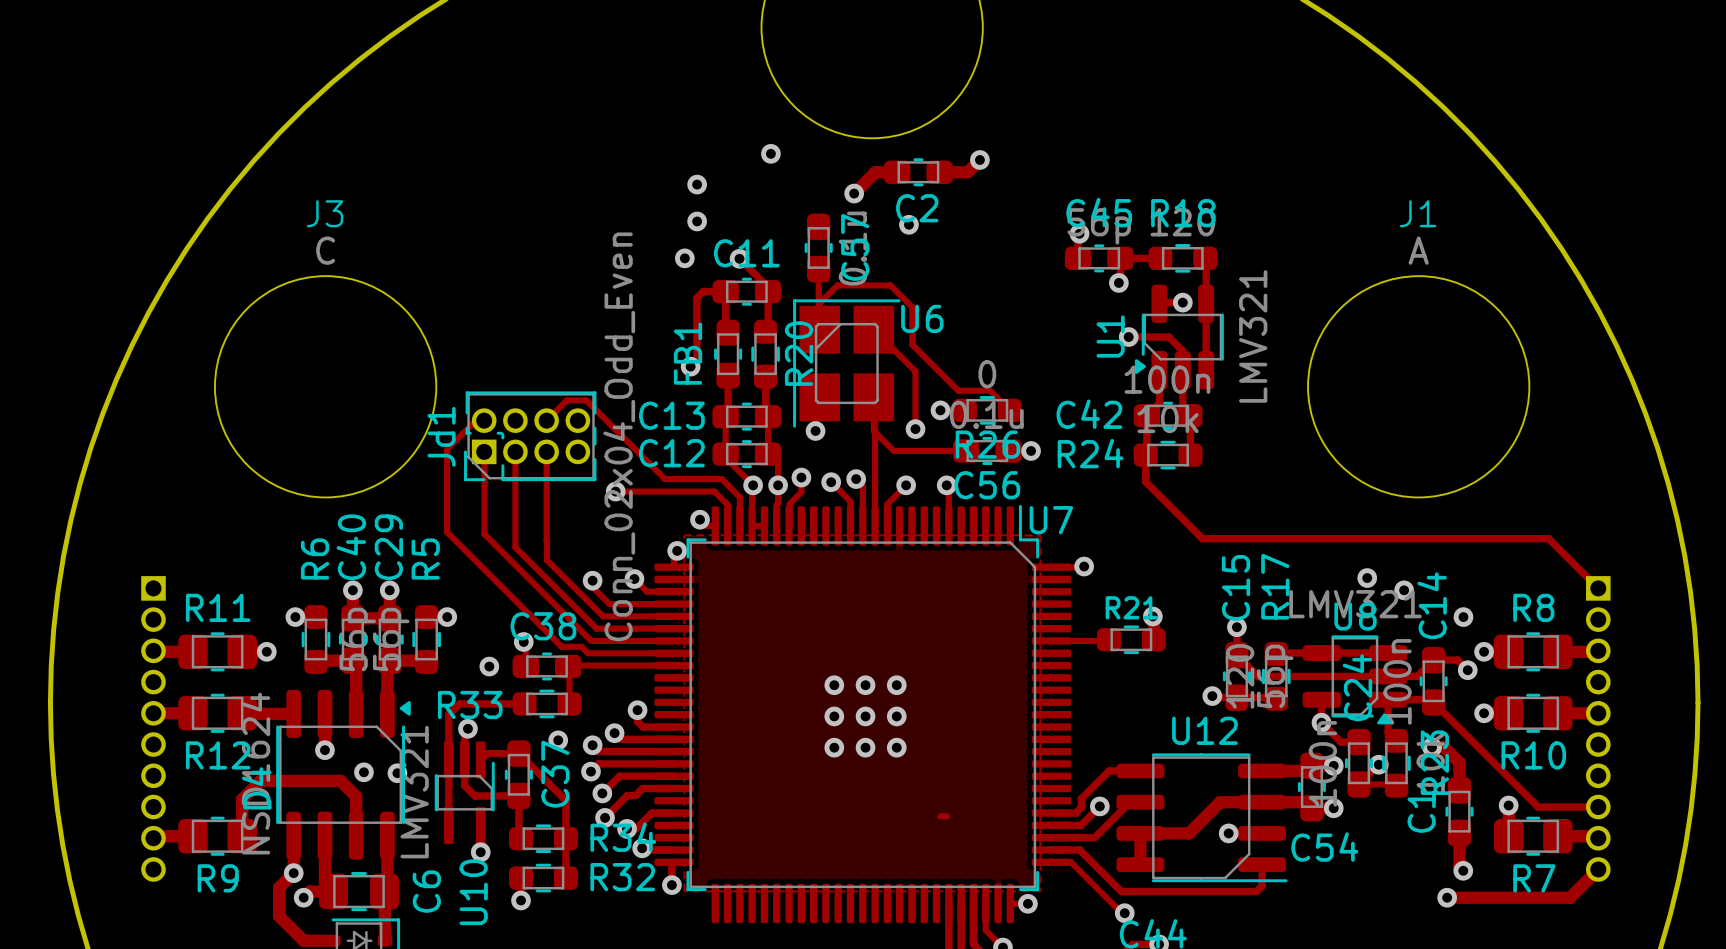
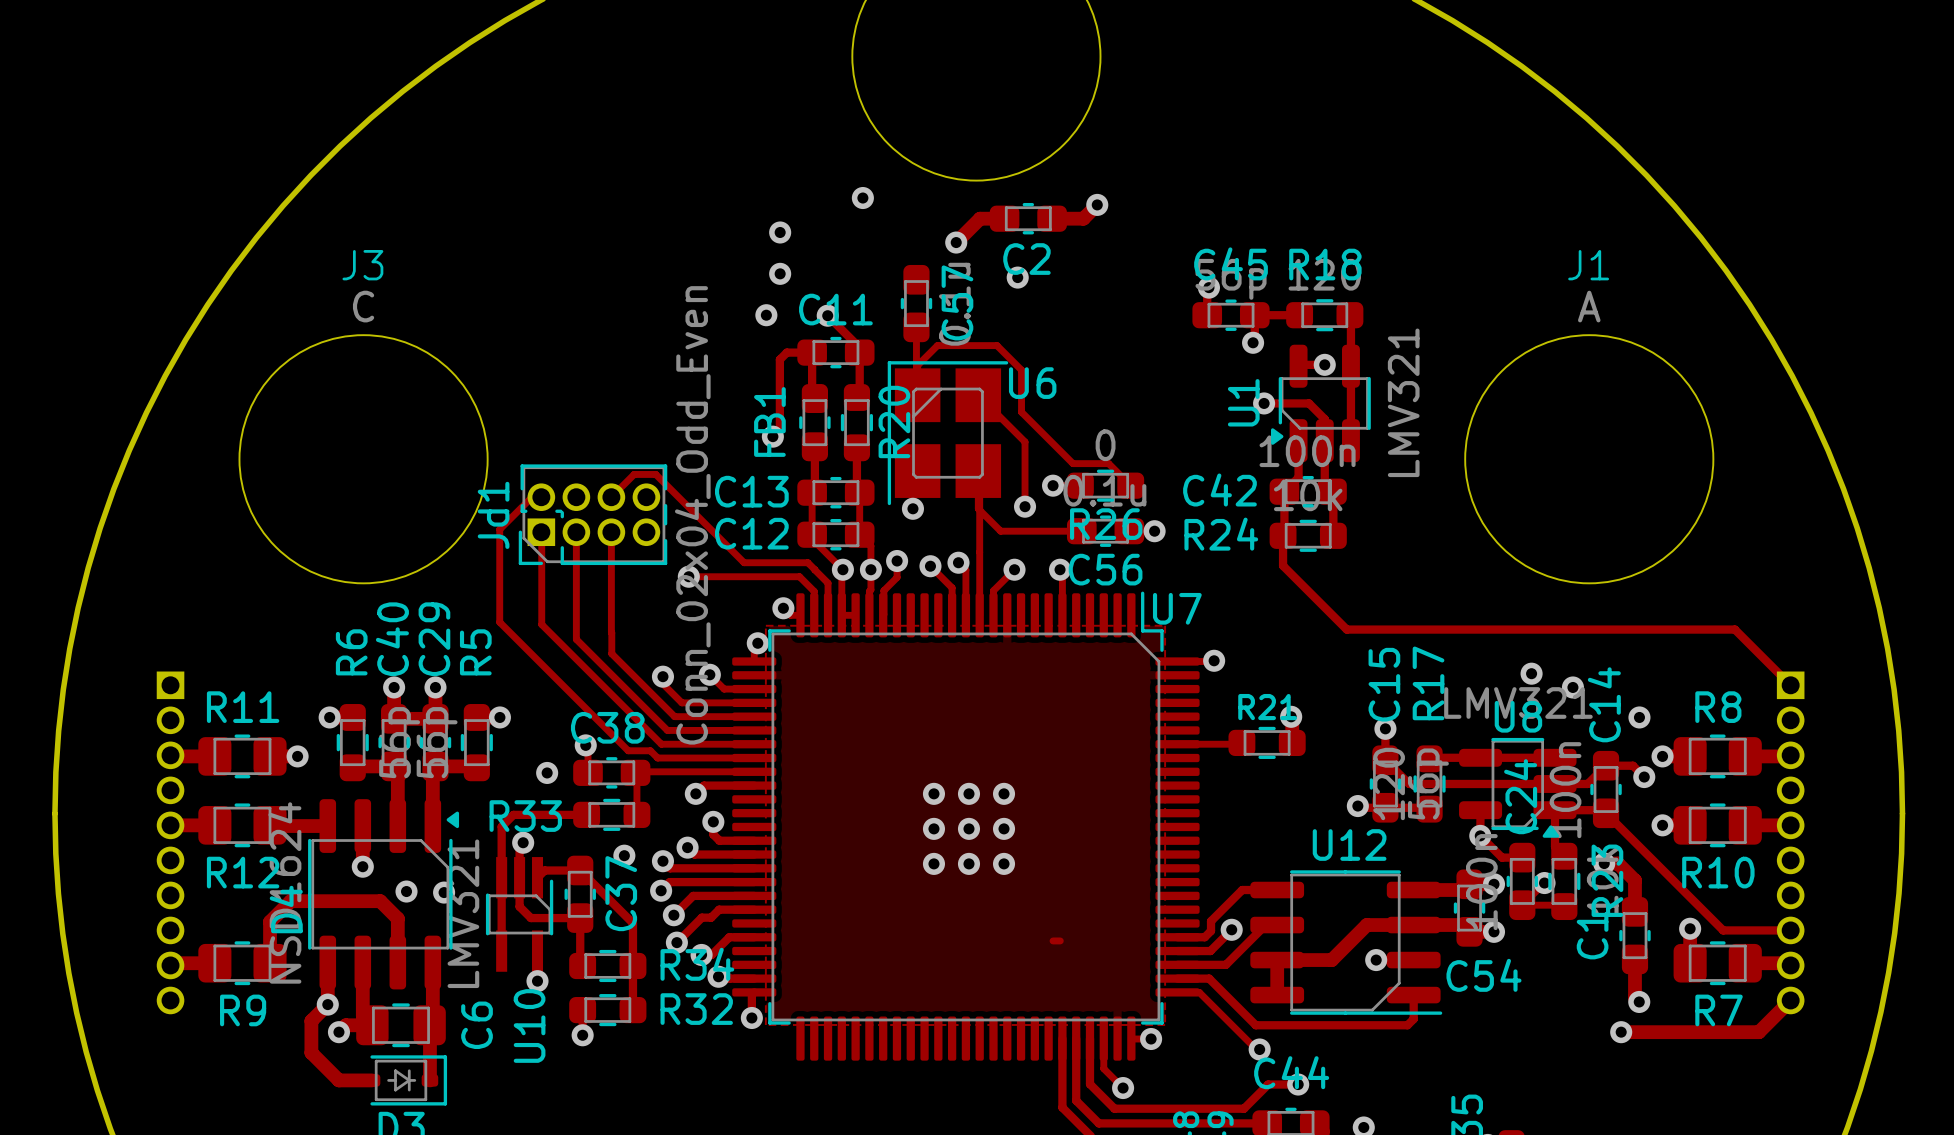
track: none -> (754, 785) (704, 785) (695, 793)
via: none -> (695, 793)

